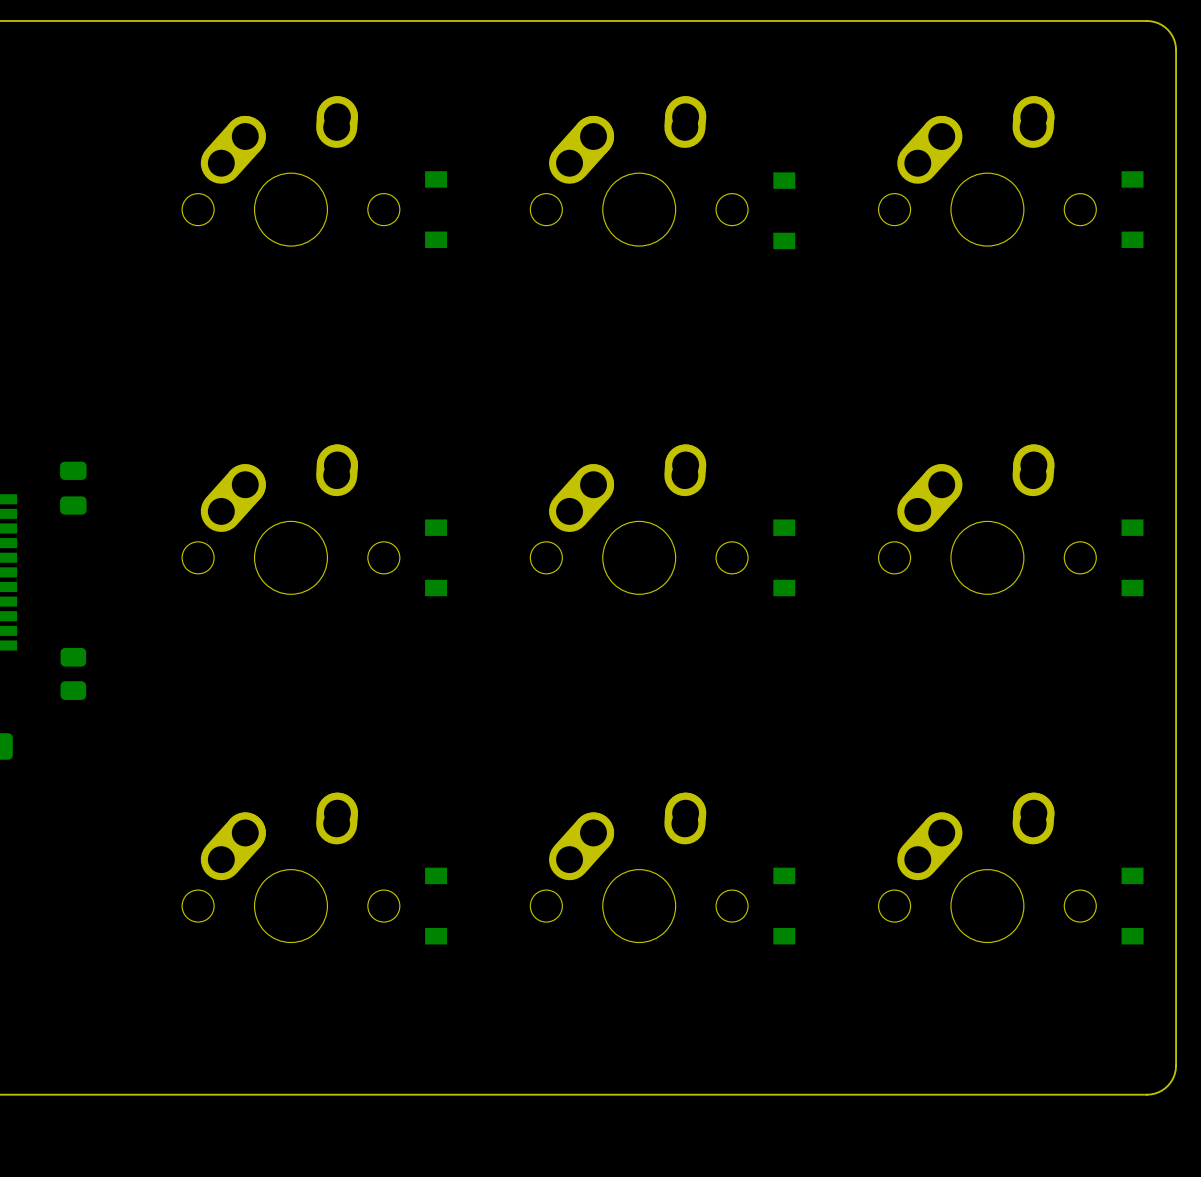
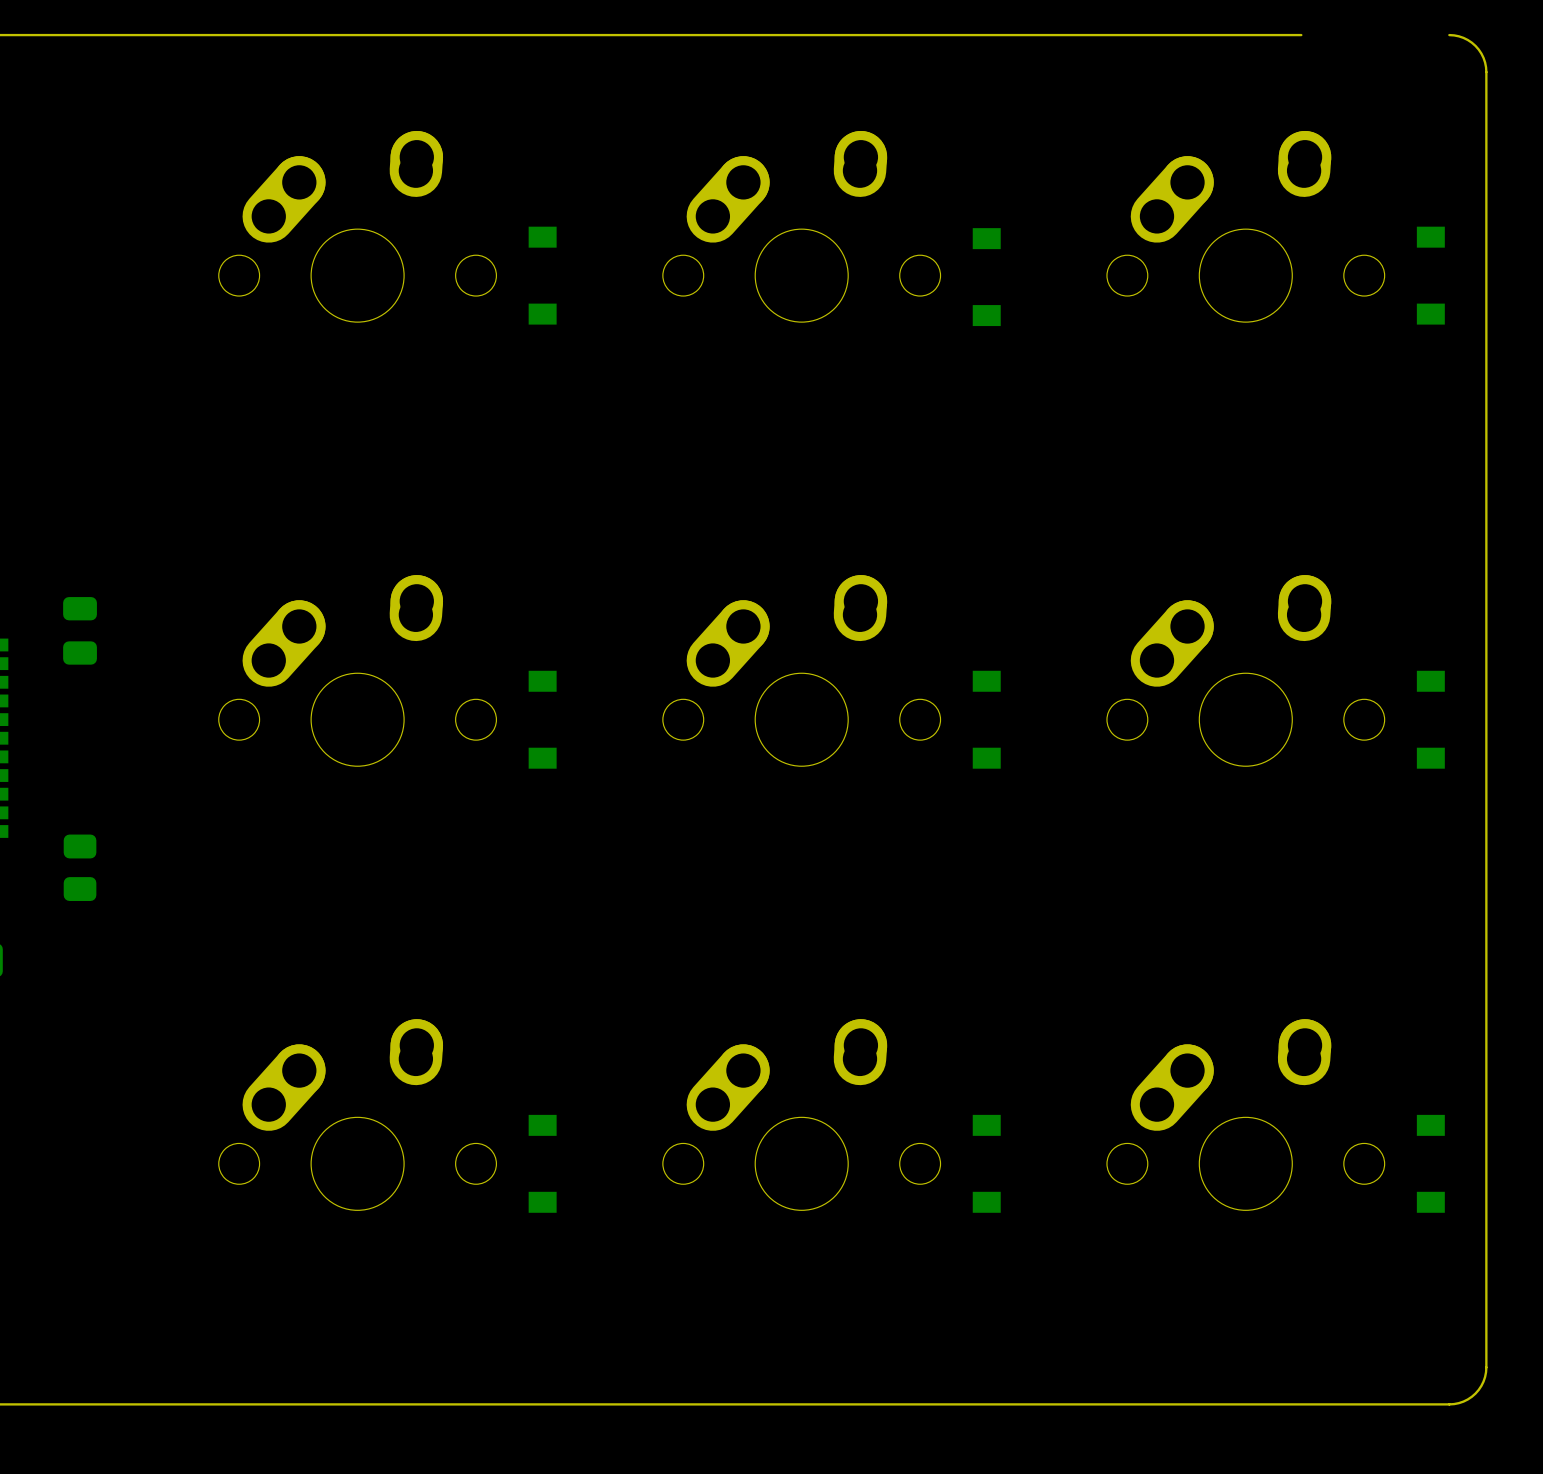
board edge: (1030, 21) (1147, 21) -> none

